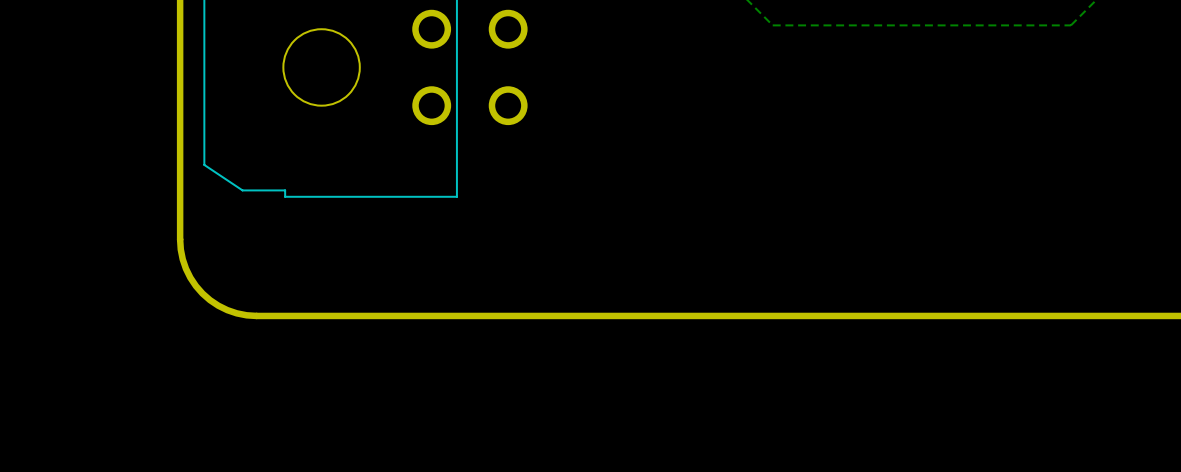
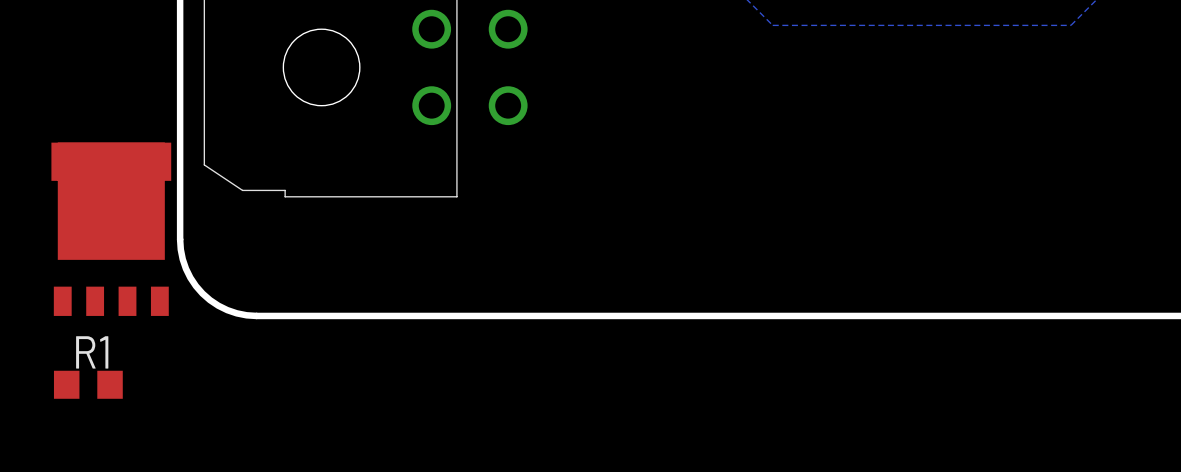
part: none -> (111, 229)
R1: none -> (88, 384)

